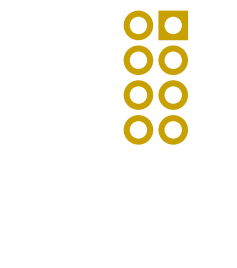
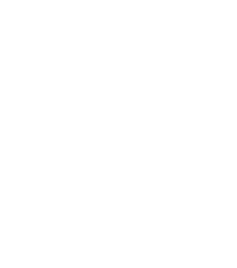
part: (155, 77) -> none

